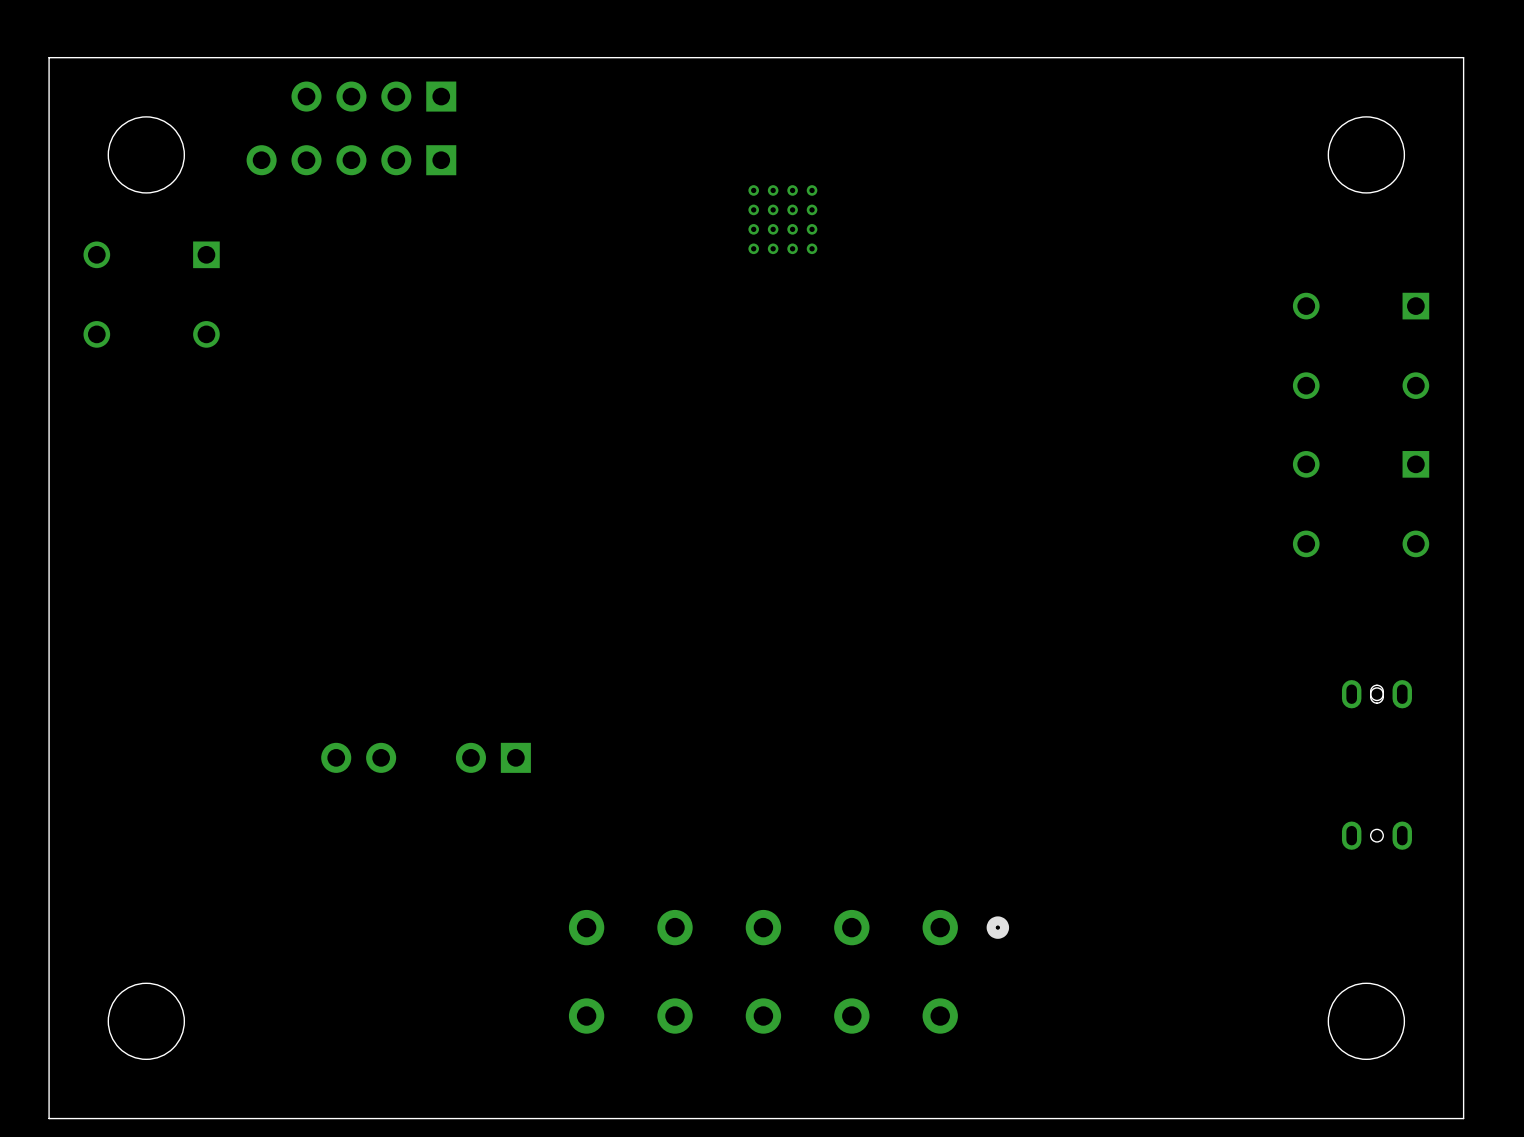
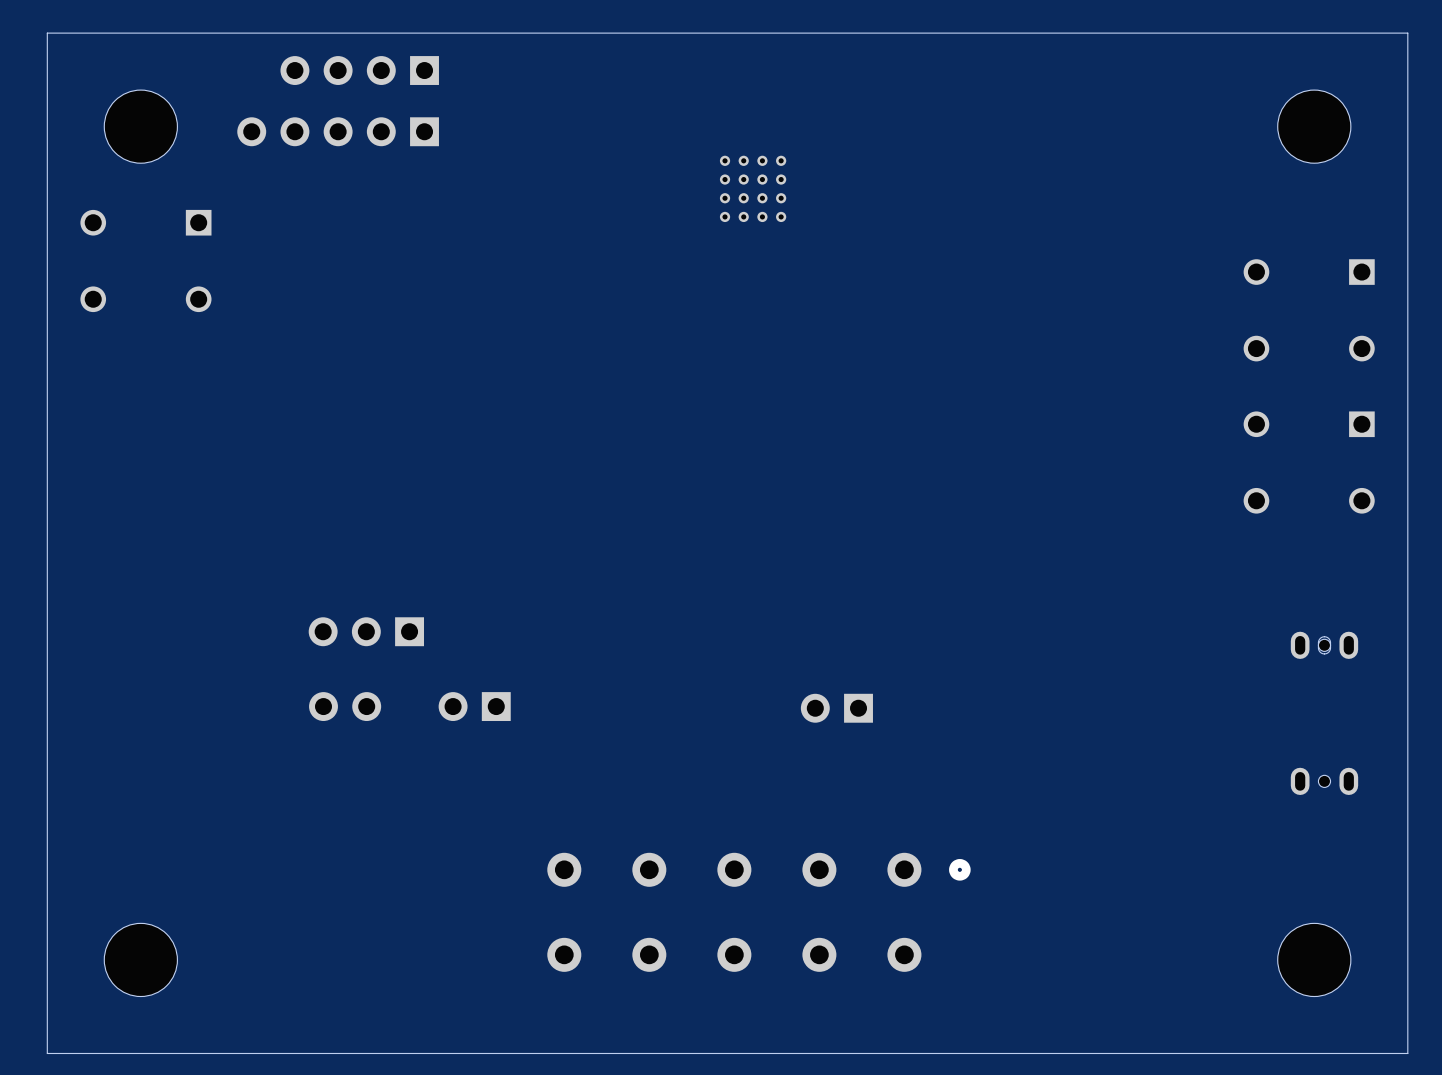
part: none -> (366, 631)
part: none -> (836, 708)

